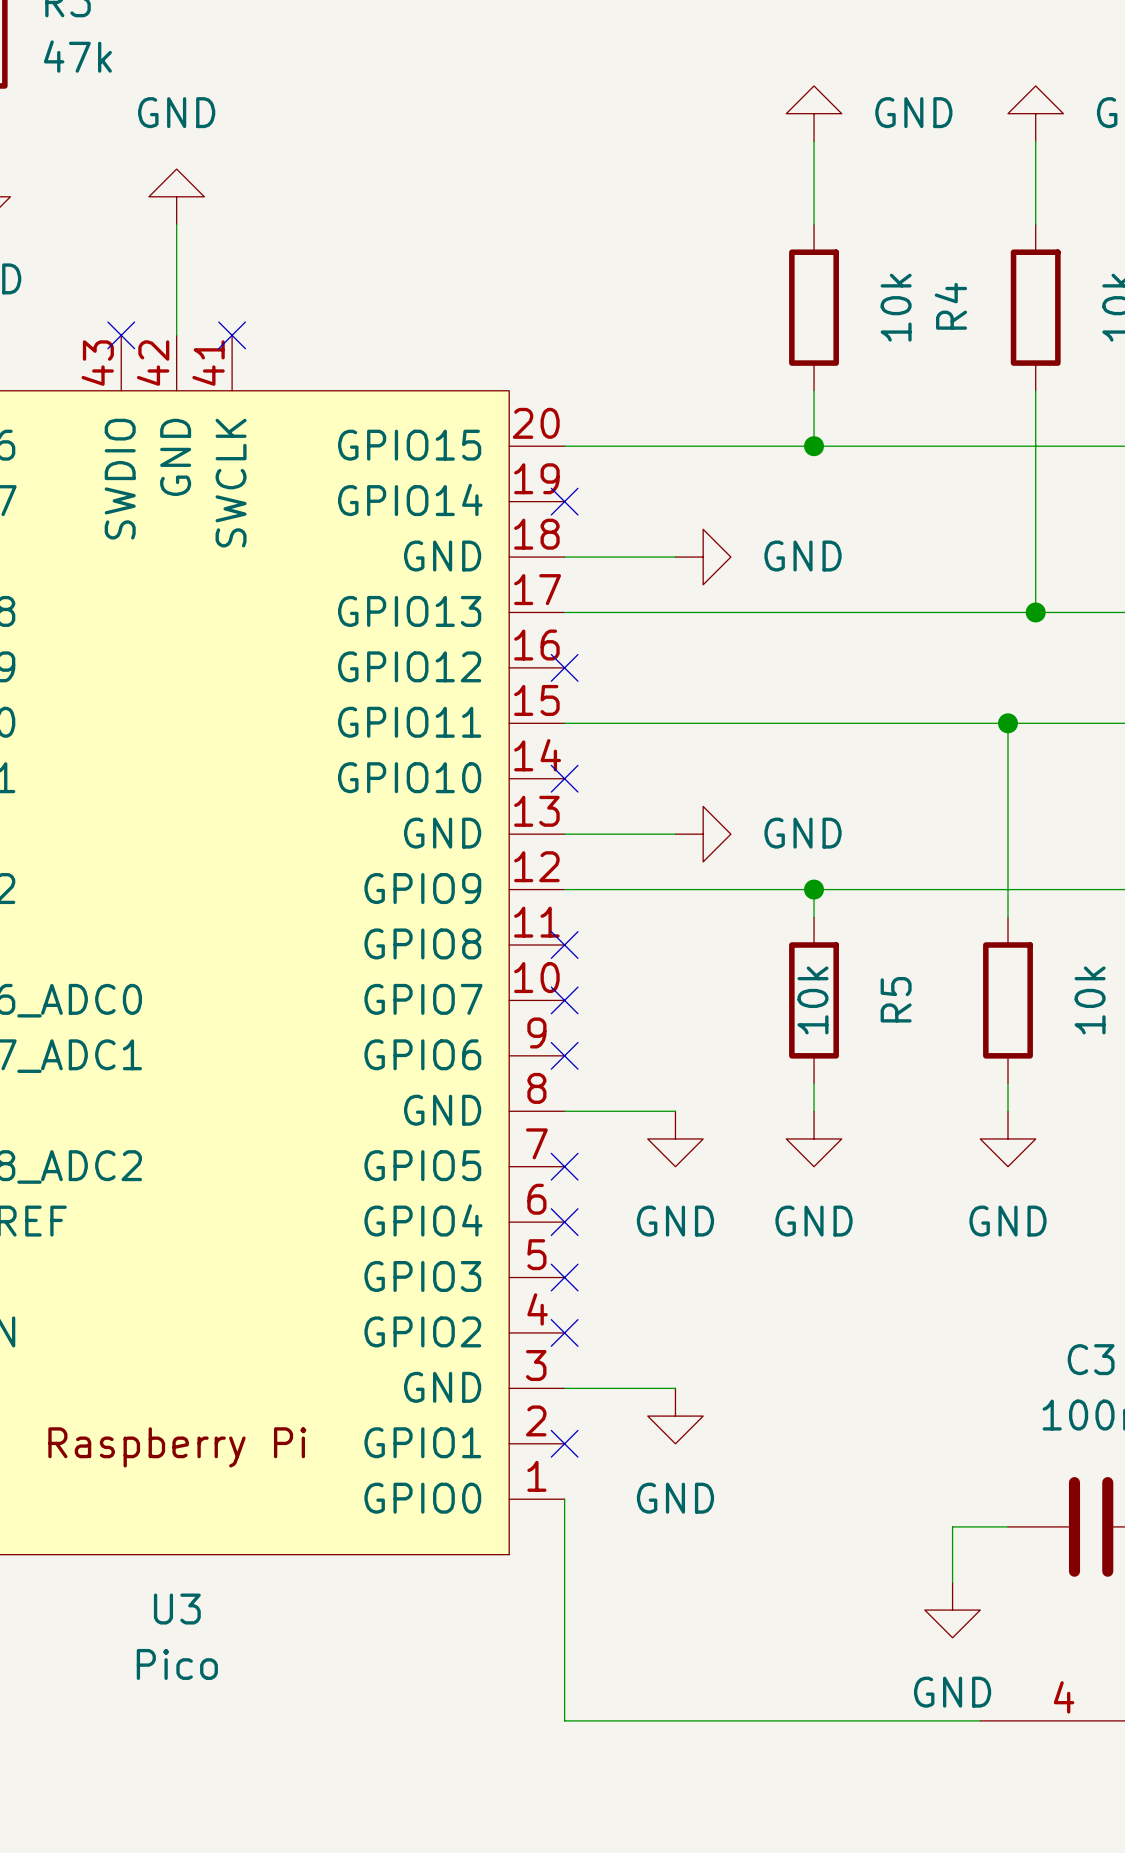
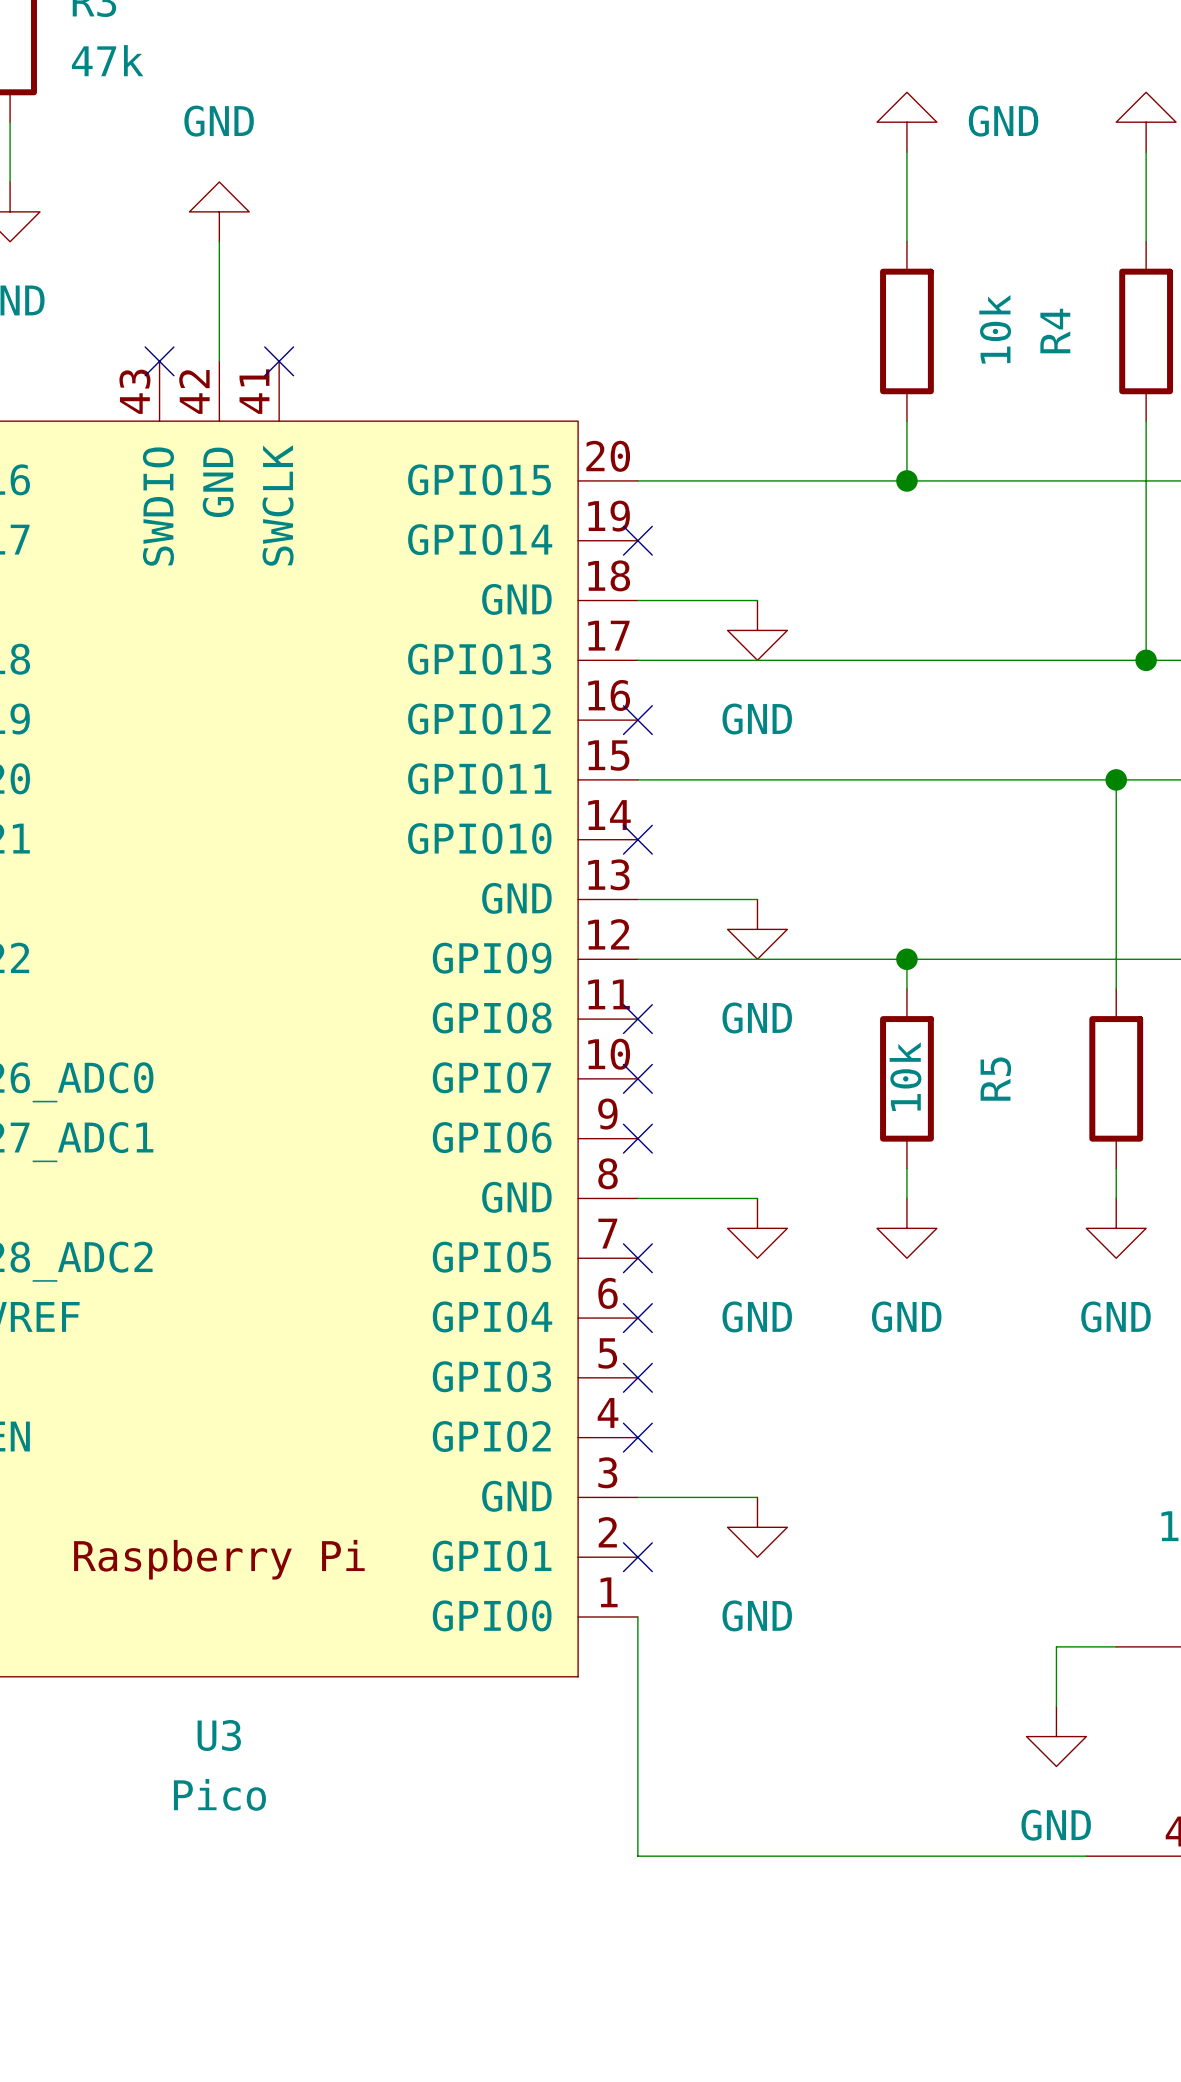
power symbol rotation: 0° (703, 557) -> 90° clockwise (757, 630)
power symbol position: GND (703, 557) -> GND (757, 630)
power symbol rotation: 0° (703, 834) -> 90° clockwise (757, 929)
power symbol position: GND (703, 834) -> GND (757, 929)

